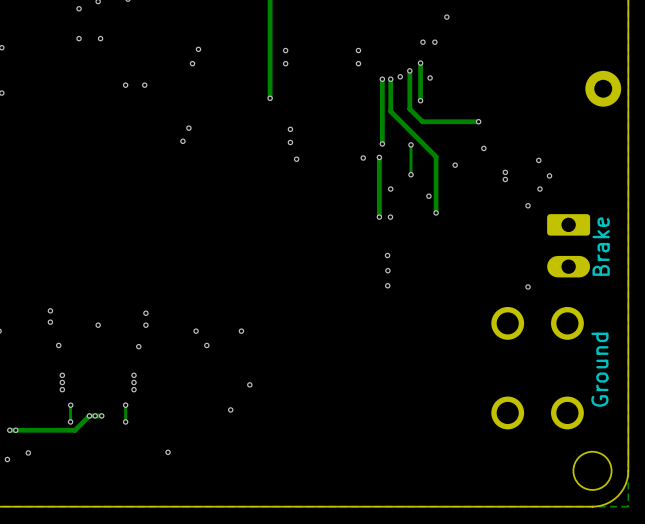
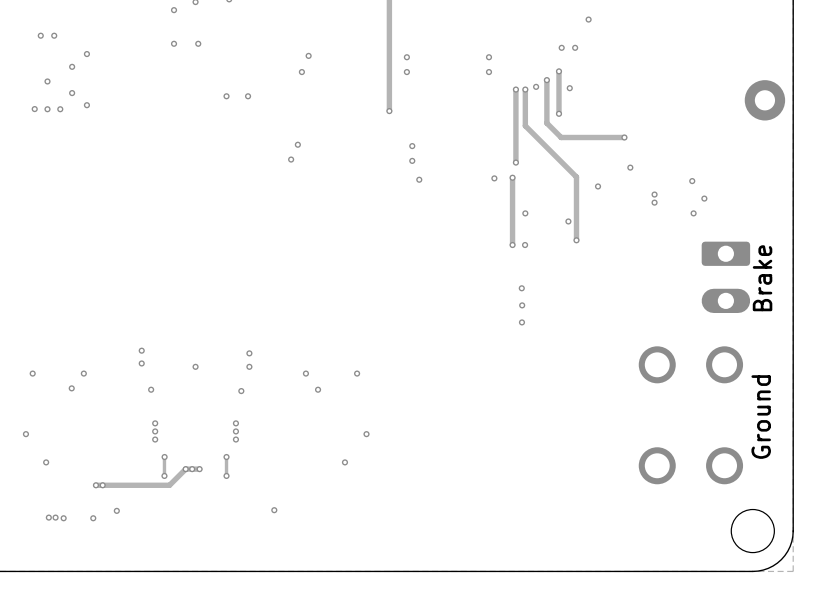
track: (411, 144) (411, 174) -> none
via: (411, 144) -> none
via: (411, 174) -> none
via: (528, 205) -> none
via: (528, 286) -> none

